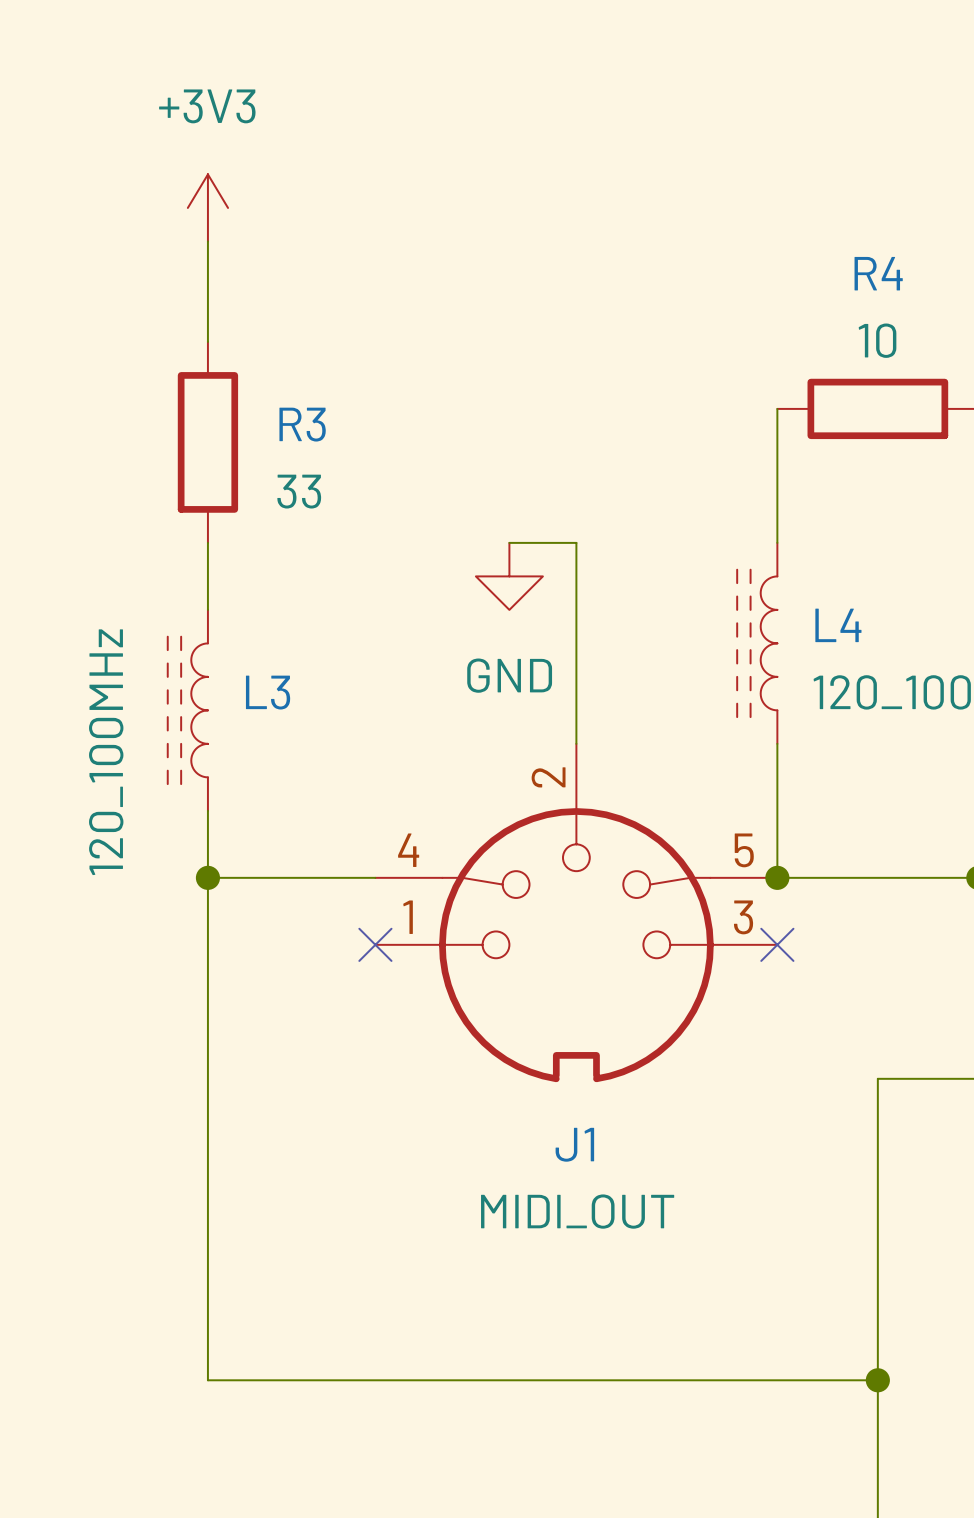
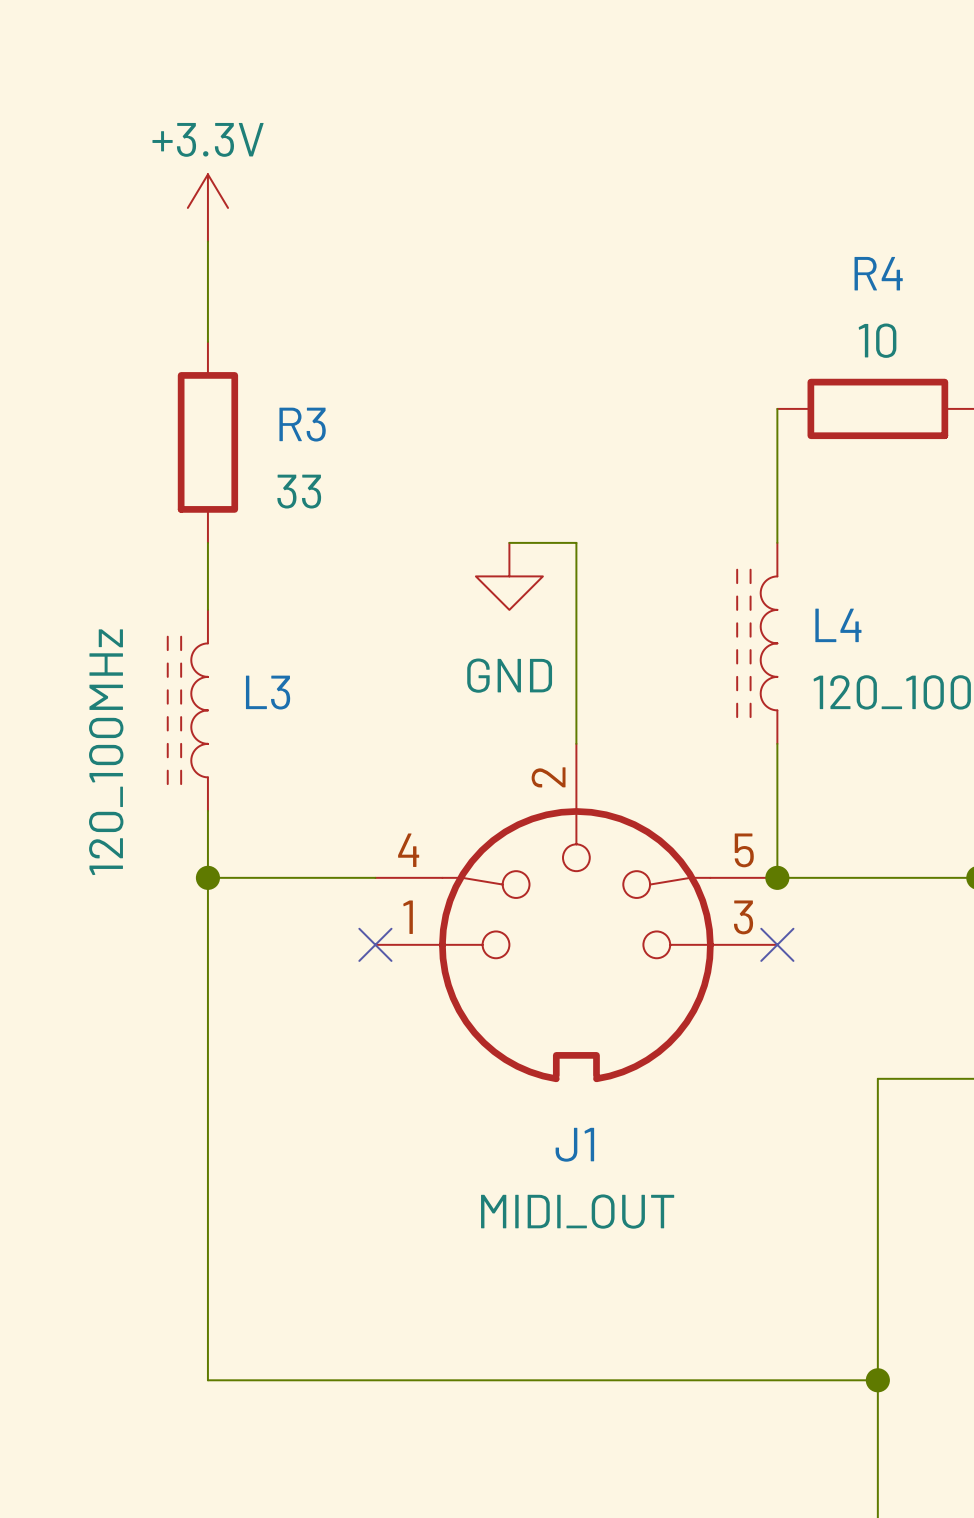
power symbol: +3V3 (207, 207) -> +3.3V (207, 207)

